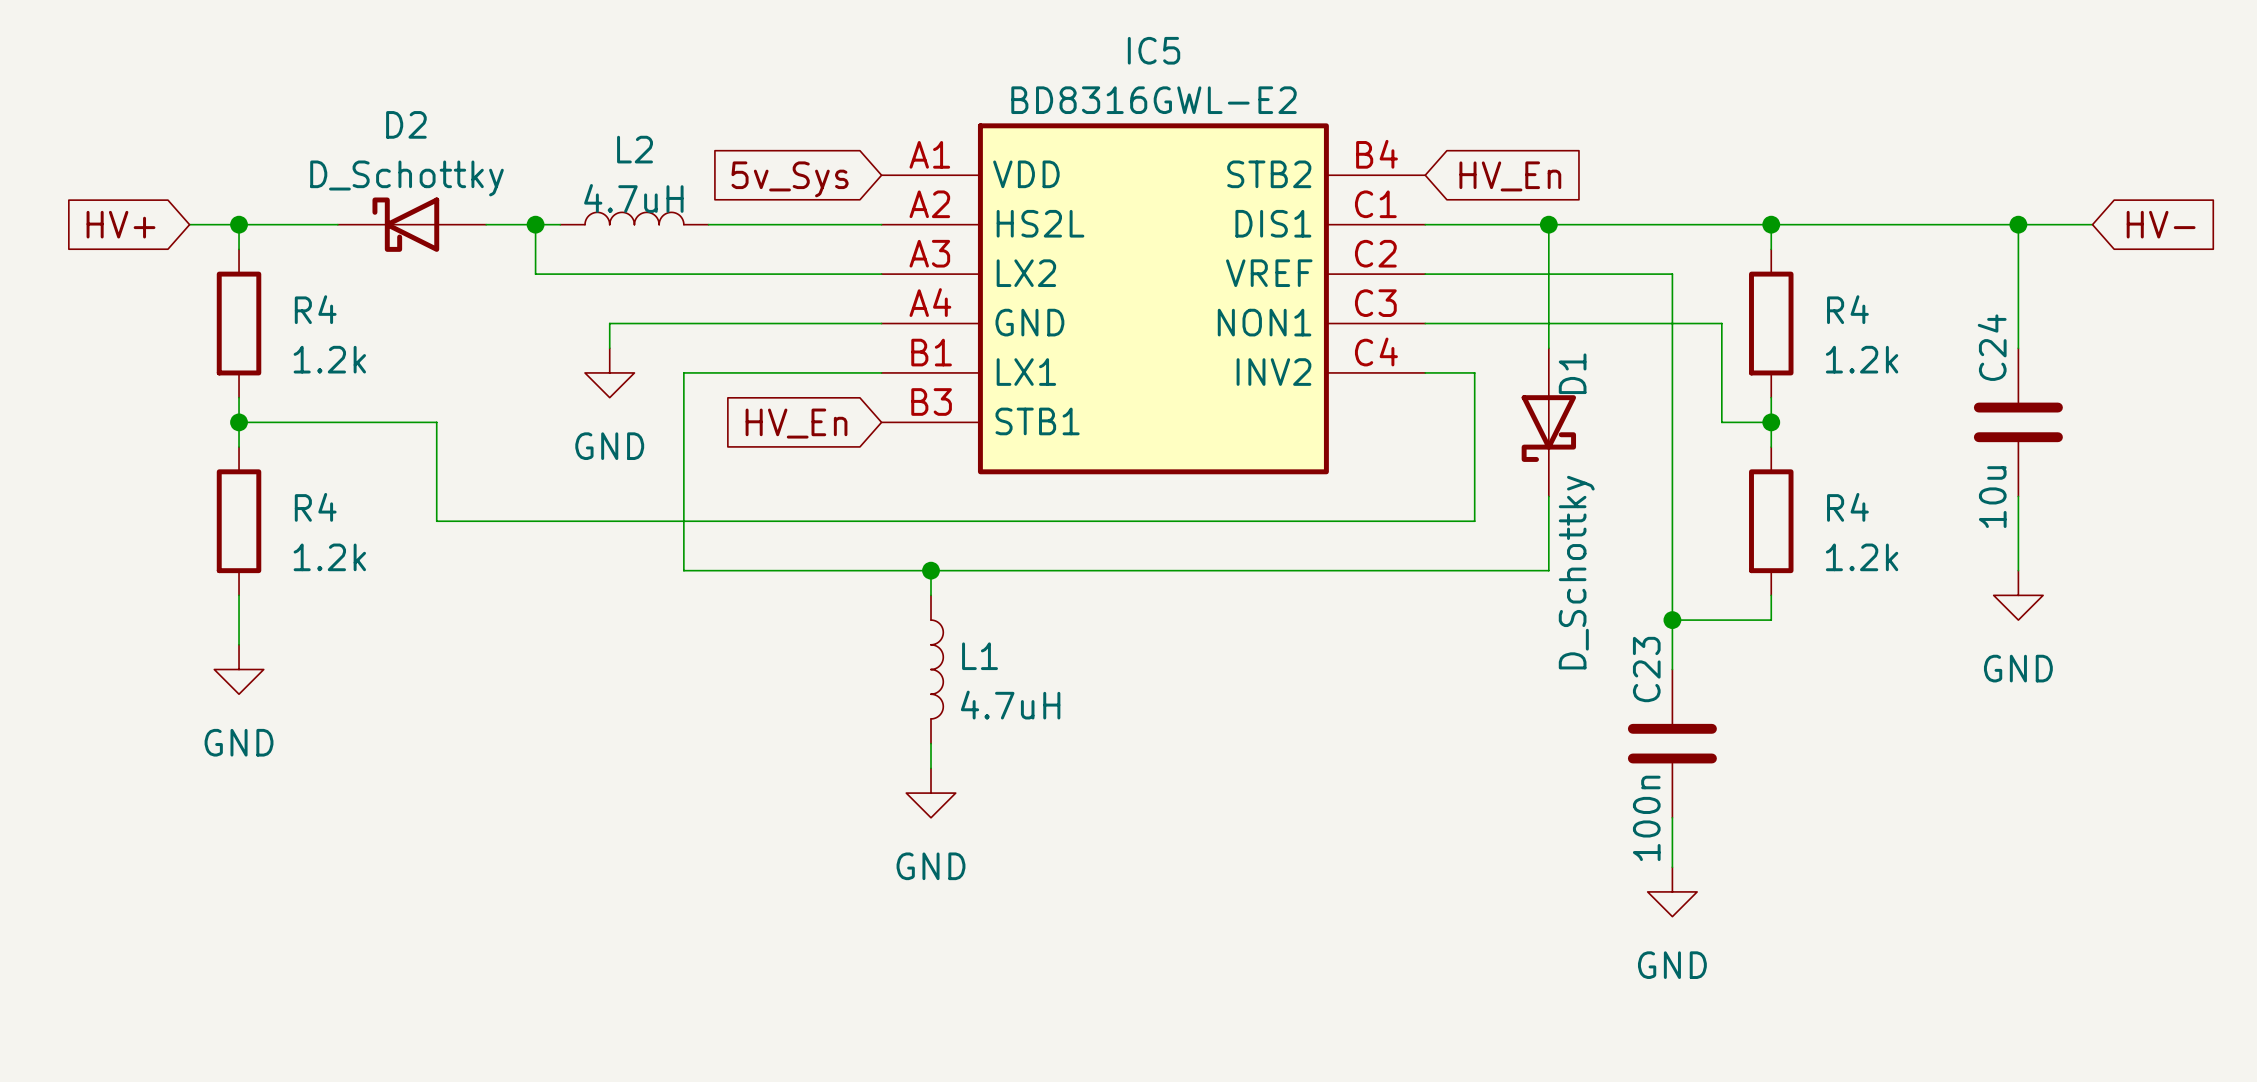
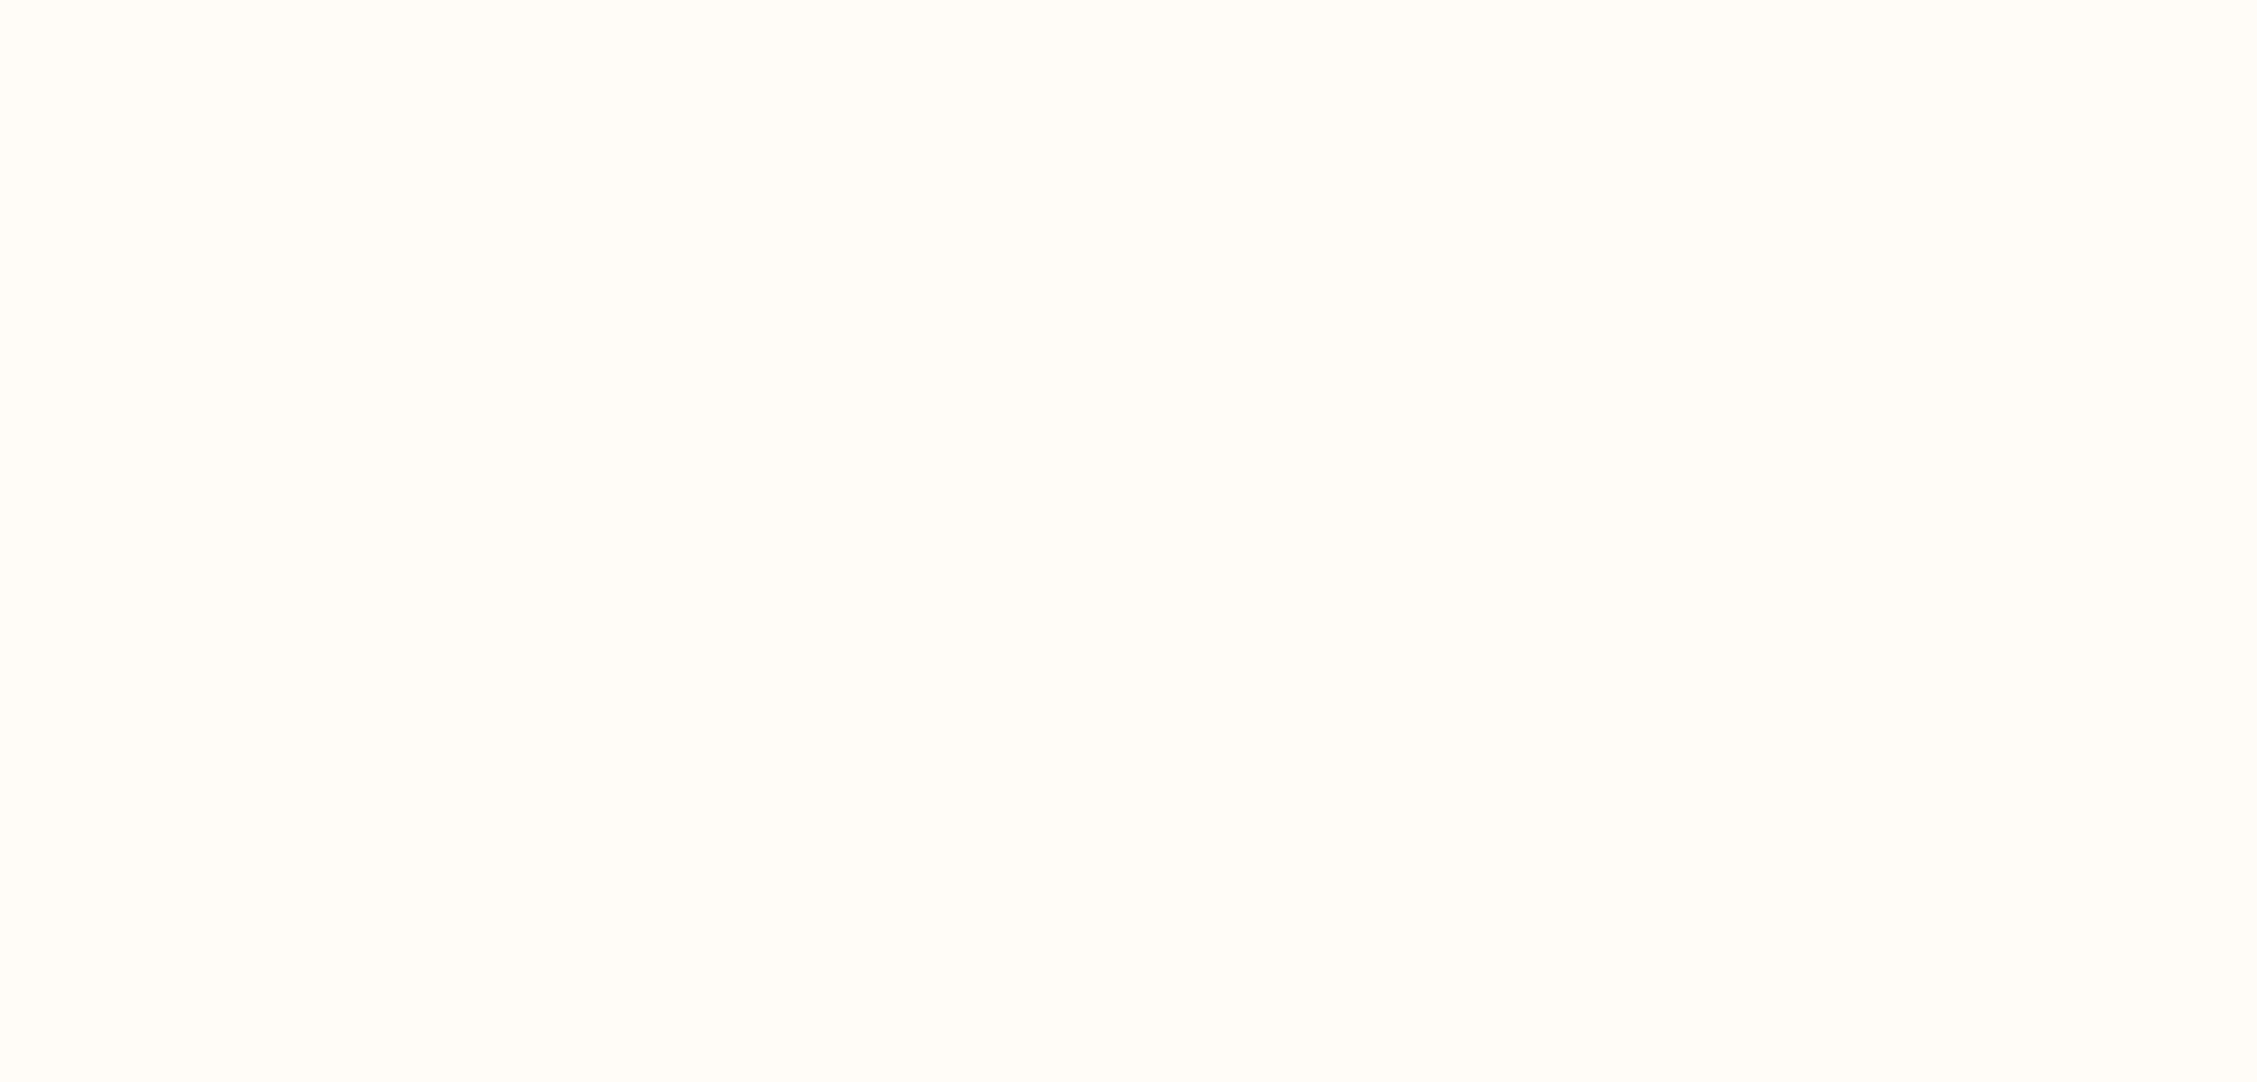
global label: HV_En (1510, 176) -> none
global label: 5v_Sys (790, 179) -> none
L2: 4.7uH (634, 218) -> none
global label: HV+ (121, 224) -> none
wire: (189, 224) (337, 224) -> none
wire: (239, 224) (239, 249) -> none
junction: (239, 224) -> none
D2: D_Schottky (412, 224) -> none
wire: (486, 224) (560, 224) -> none
wire: (535, 224) (535, 274) (881, 274) -> none
junction: (535, 224) -> none
wire: (708, 224) (881, 224) -> none
wire: (1425, 224) (2092, 224) -> none
wire: (1548, 224) (1548, 348) -> none
junction: (1548, 224) -> none
wire: (1771, 224) (1771, 249) -> none
junction: (1771, 224) -> none
wire: (2018, 224) (2018, 348) -> none
junction: (2018, 224) -> none
global label: HV- (2161, 224) -> none
wire: (1425, 274) (1672, 274) (1672, 669) -> none
IC5: BD8316GWL-E2 (1153, 298) -> none
R4: 1.2k (239, 323) -> none
wire: (881, 323) (609, 323) (609, 348) -> none
wire: (1425, 323) (1721, 323) (1721, 422) (1771, 422) -> none
R4: 1.2k (1771, 323) -> none
power symbol: GND (609, 372) -> none
wire: (881, 372) (683, 372) (683, 570) (1548, 570) (1548, 496) -> none
wire: (1425, 372) (1474, 372) (1474, 521) (436, 521) (436, 422) (239, 422) -> none
wire: (239, 397) (239, 447) -> none
wire: (1771, 397) (1771, 447) -> none
junction: (239, 422) -> none
D1: D_Schottky (1548, 422) -> none
junction: (1771, 422) -> none
C24: 10u (2018, 422) -> none
global label: HV_En (796, 423) -> none
wire: (2018, 496) (2018, 570) -> none
R4: 1.2k (239, 521) -> none
R4: 1.2k (1771, 521) -> none
wire: (931, 570) (931, 595) -> none
junction: (931, 570) -> none
wire: (239, 595) (239, 644) -> none
wire: (1771, 595) (1771, 620) (1672, 620) -> none
power symbol: GND (2018, 595) -> none
junction: (1672, 620) -> none
power symbol: GND (239, 669) -> none
L1: 4.7uH (937, 669) -> none
wire: (931, 743) (931, 768) -> none
C23: 100n (1672, 743) -> none
power symbol: GND (931, 793) -> none
wire: (1672, 817) (1672, 867) -> none
power symbol: GND (1672, 891) -> none

